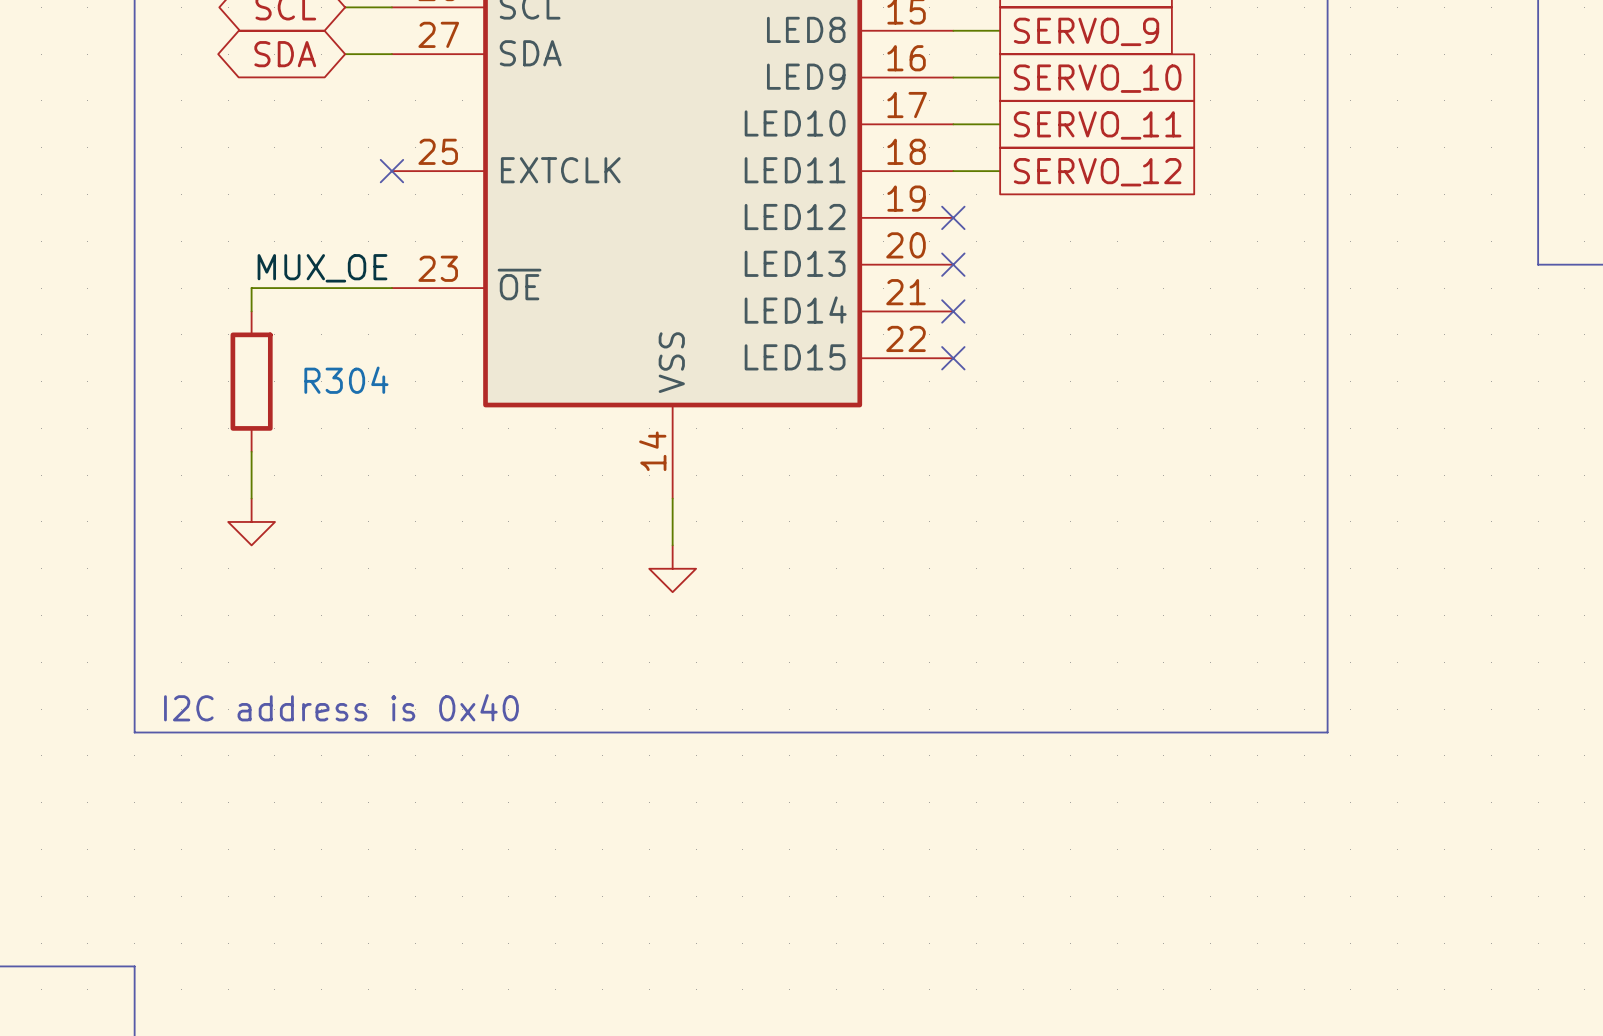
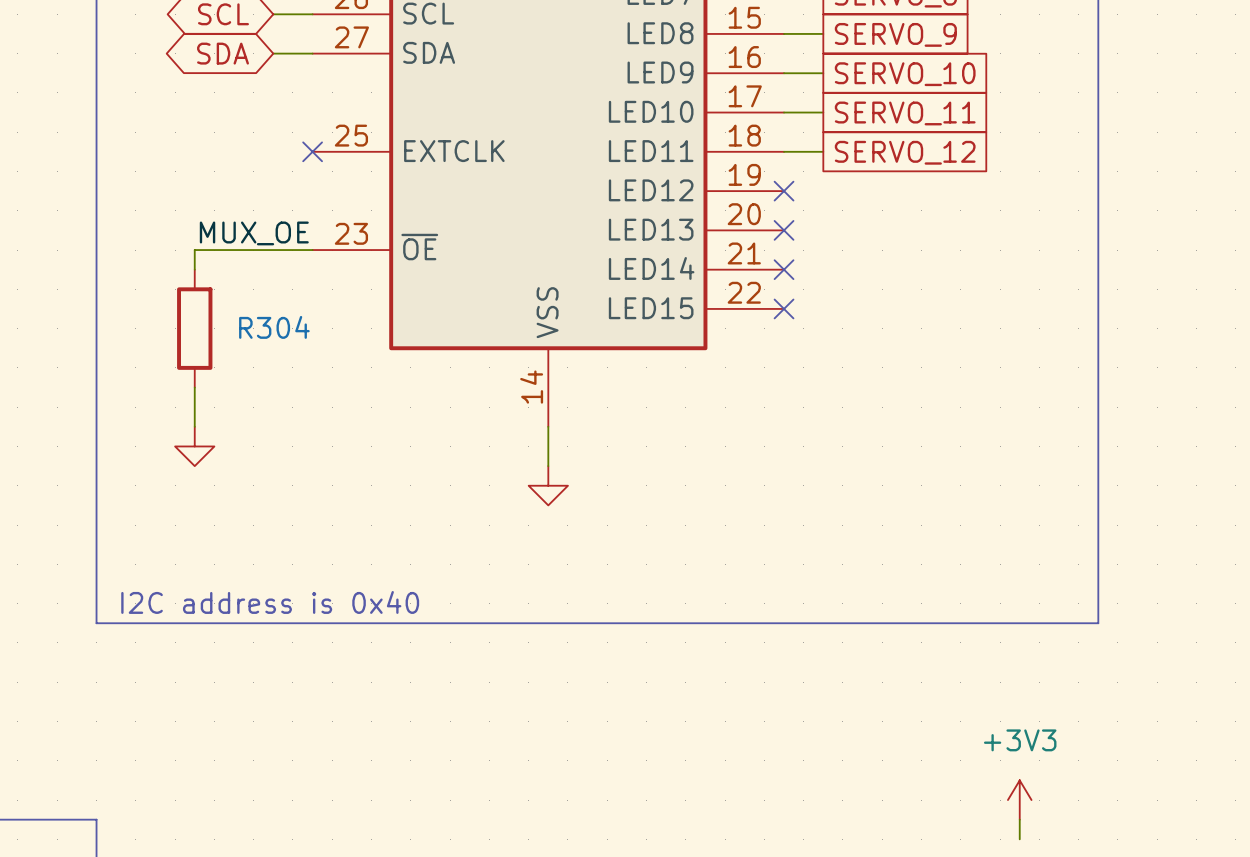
power symbol: none -> +3V3 (1019, 800)
wire: none -> (1019, 819) (1019, 839)

